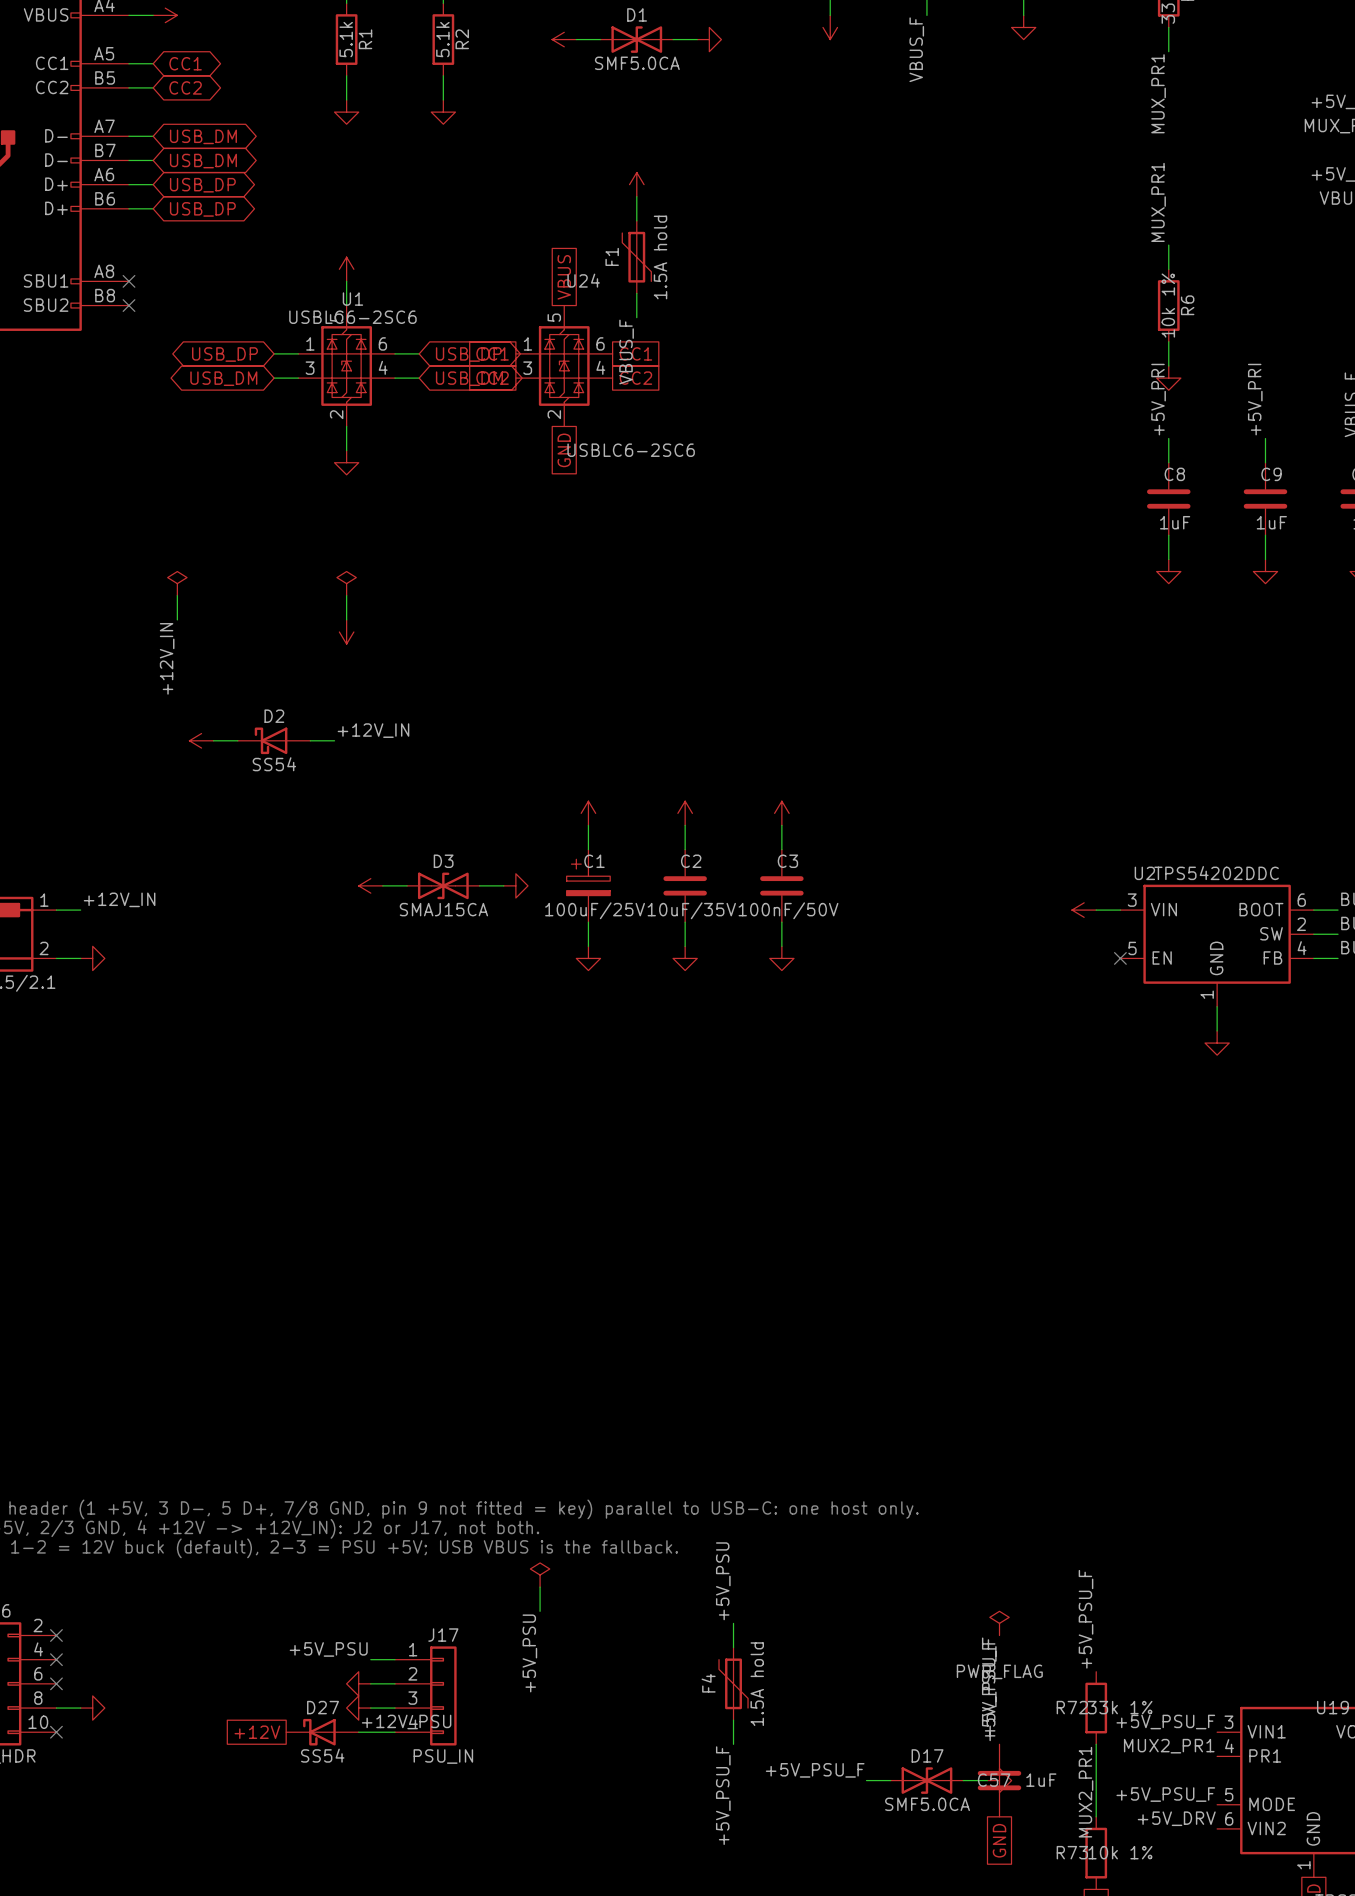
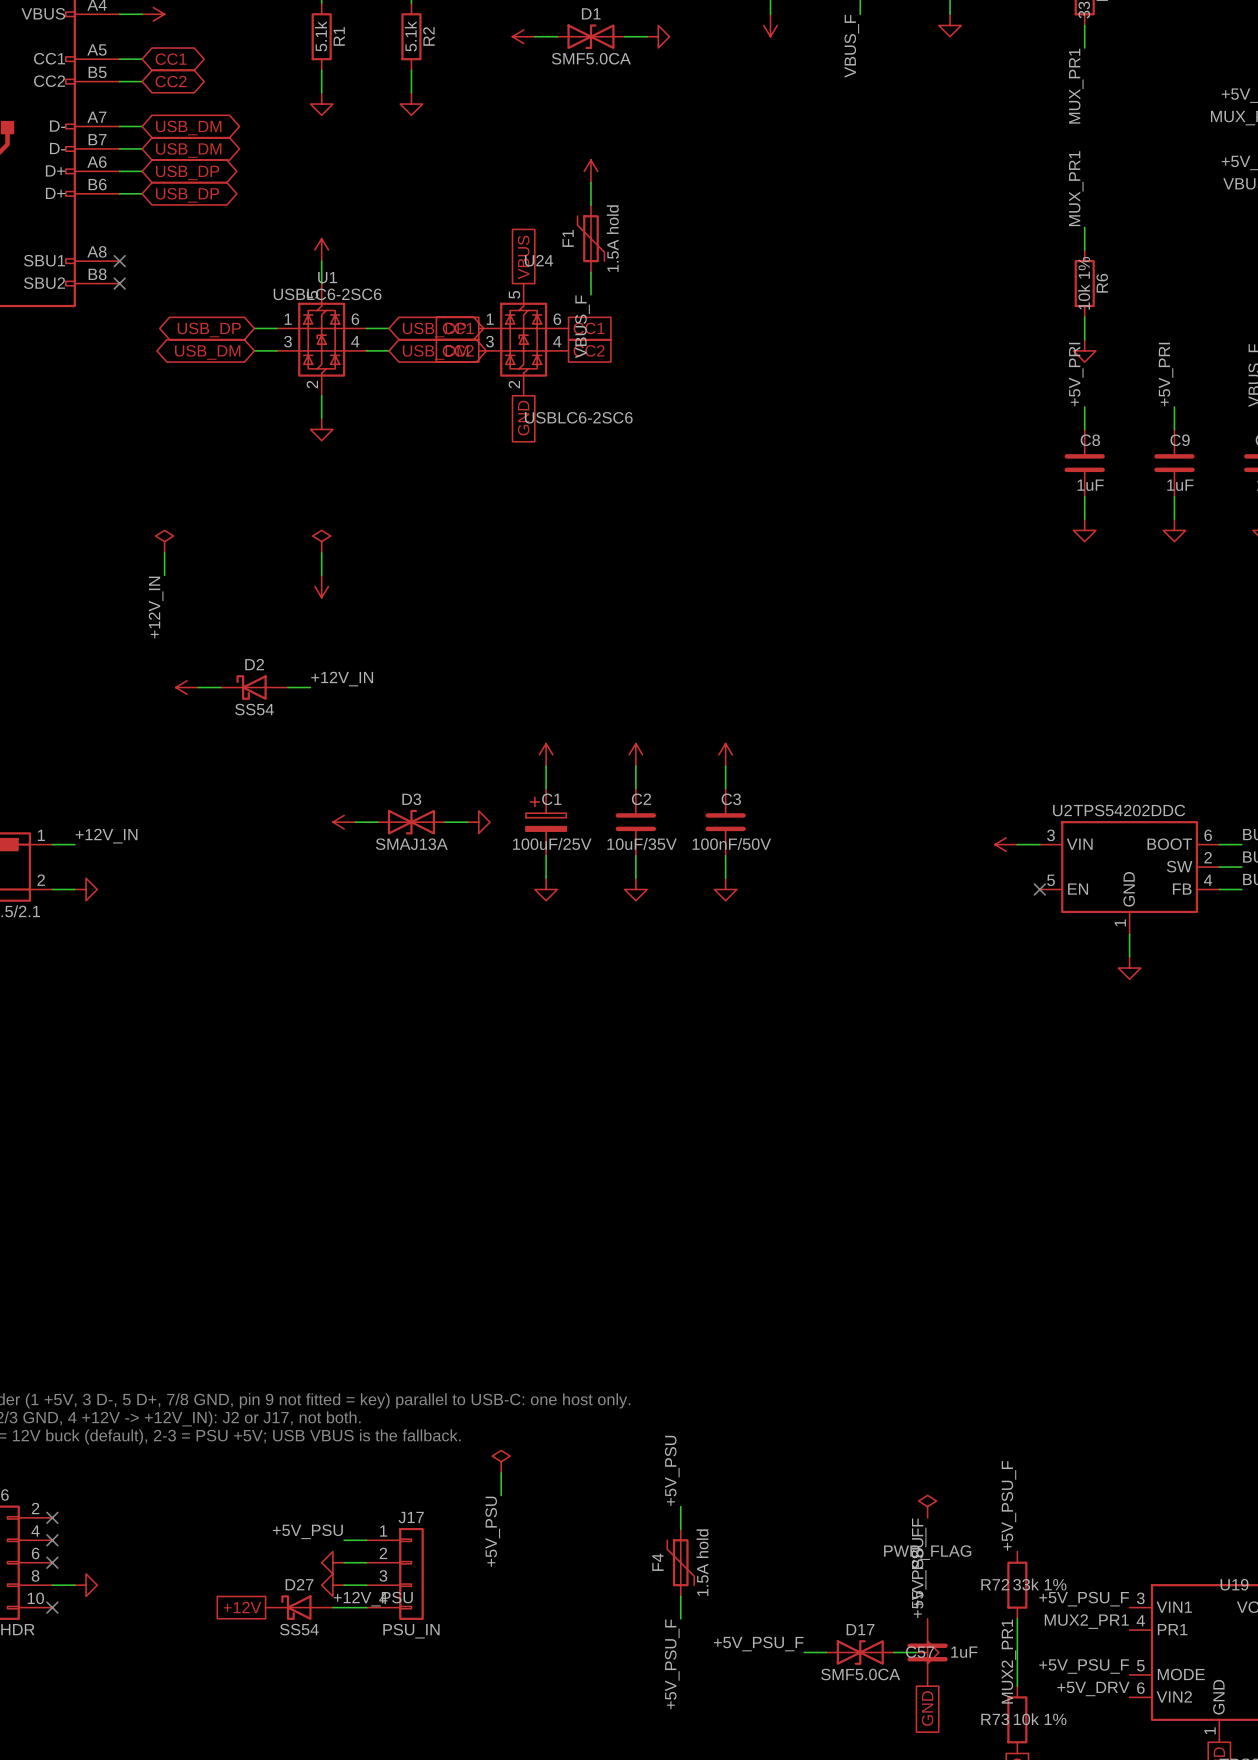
D3 value: SMAJ15CA (443, 909) -> SMAJ13A (411, 844)

